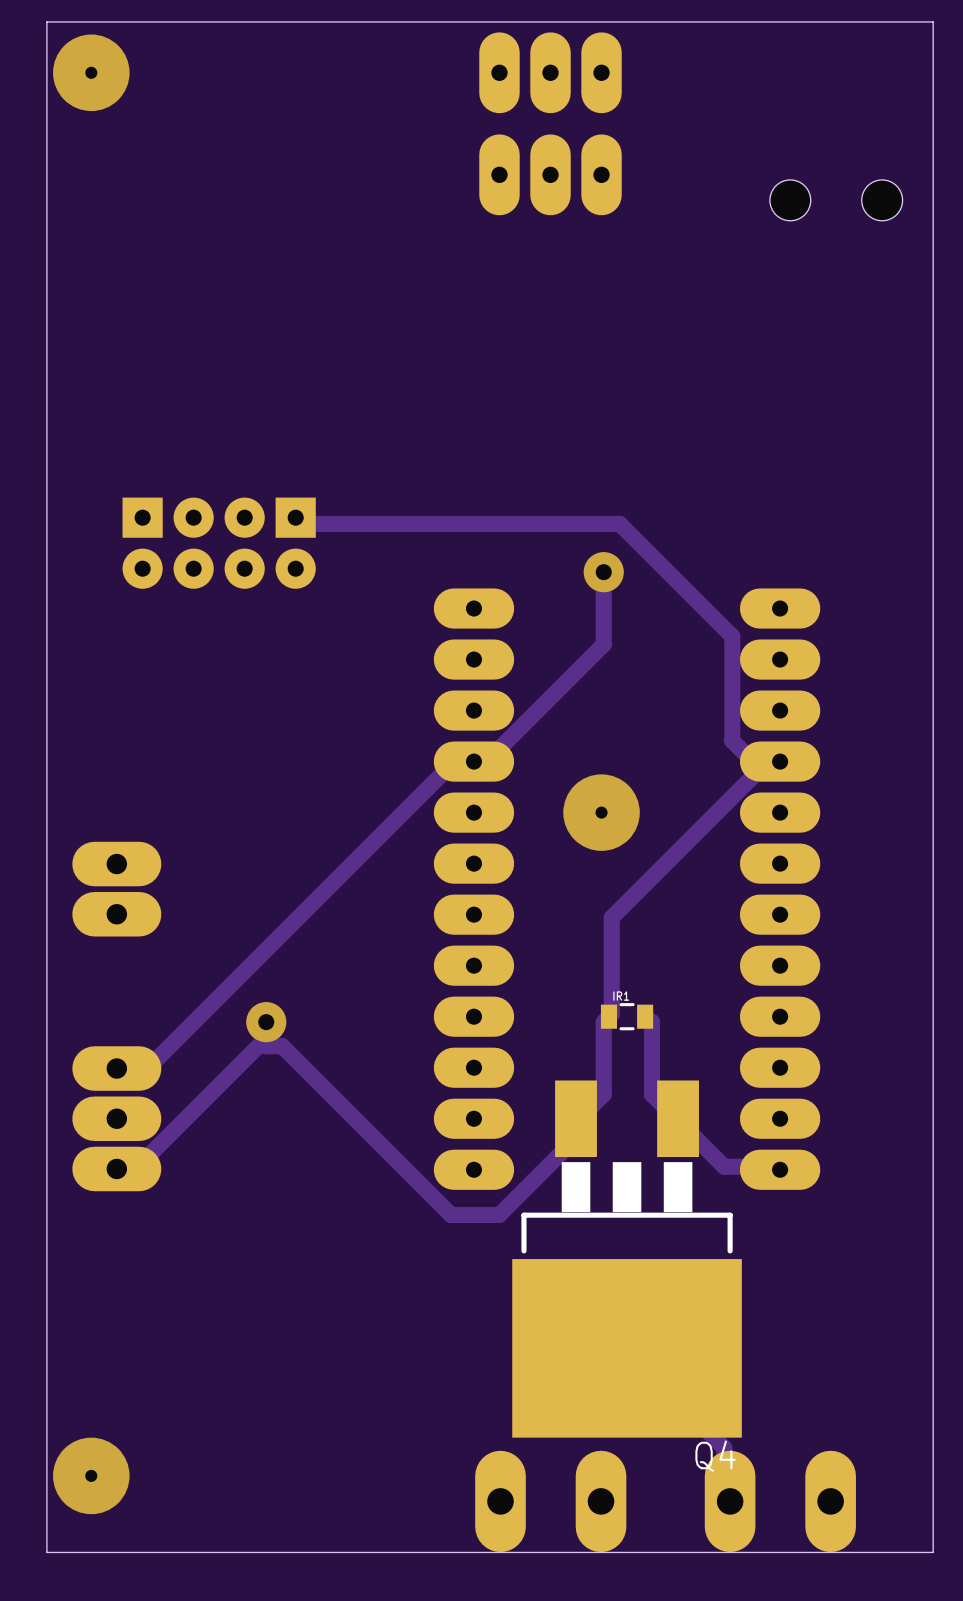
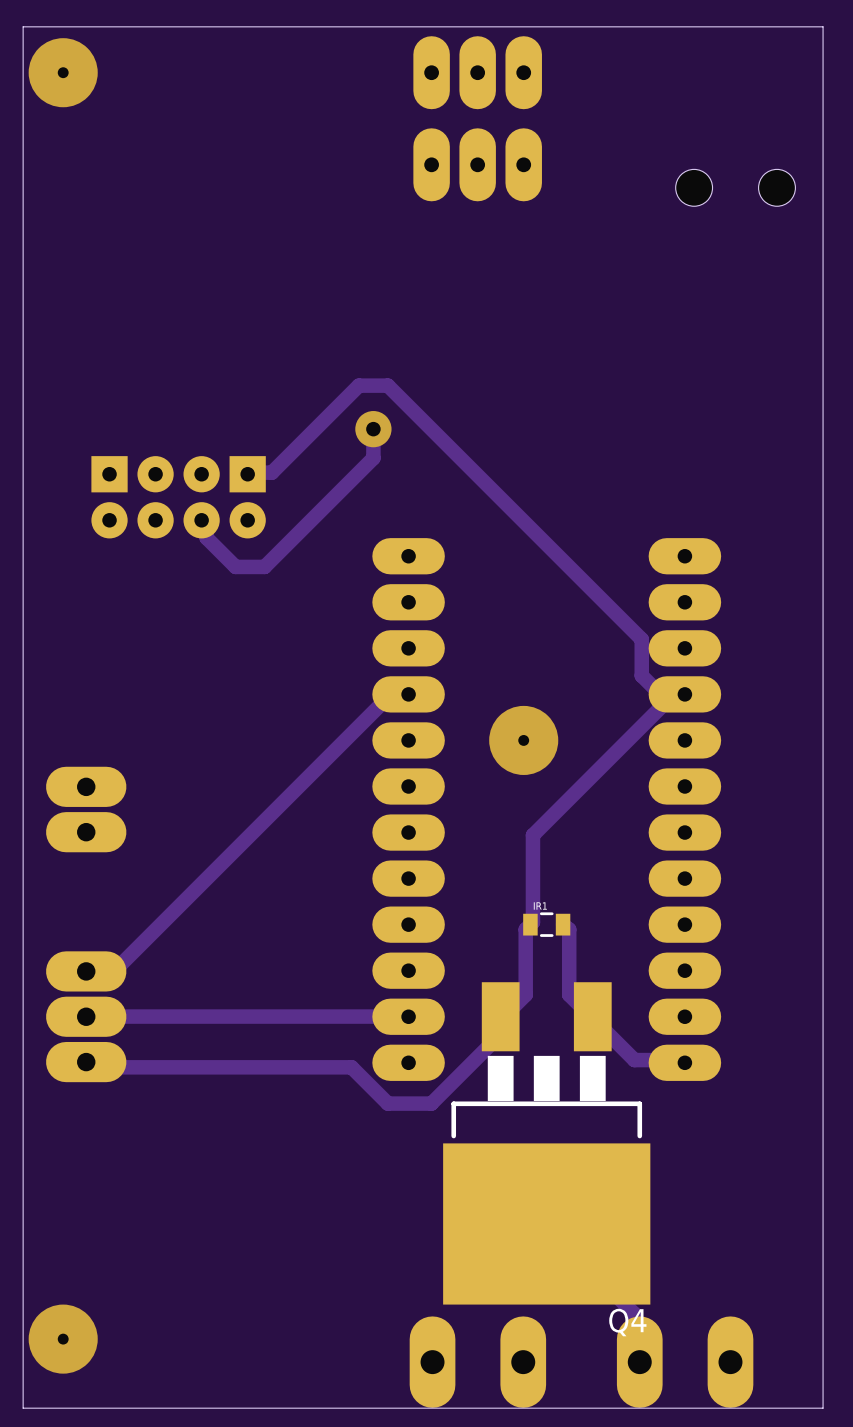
track: none -> (373, 429) (373, 458) (264, 566) (235, 566) (206, 537) (206, 523) (201, 520)
via: none -> (373, 429)
track: (295, 517) (298, 523) (619, 523) (732, 636) (732, 700) -> (247, 474) (271, 472) (358, 385) (387, 385) (641, 639)
track: (603, 572) (603, 644) (491, 756) (475, 756) (473, 761) -> none
via: (603, 572) -> none
track: (266, 1022) (266, 1038) (137, 1166) (121, 1166) (116, 1168) -> none
via: (266, 1022) -> none
track: (262, 1042) (266, 1046) (282, 1046) (410, 1174) -> (86, 1062) (90, 1067) (351, 1067)
track: none -> (408, 1016) (86, 1016)

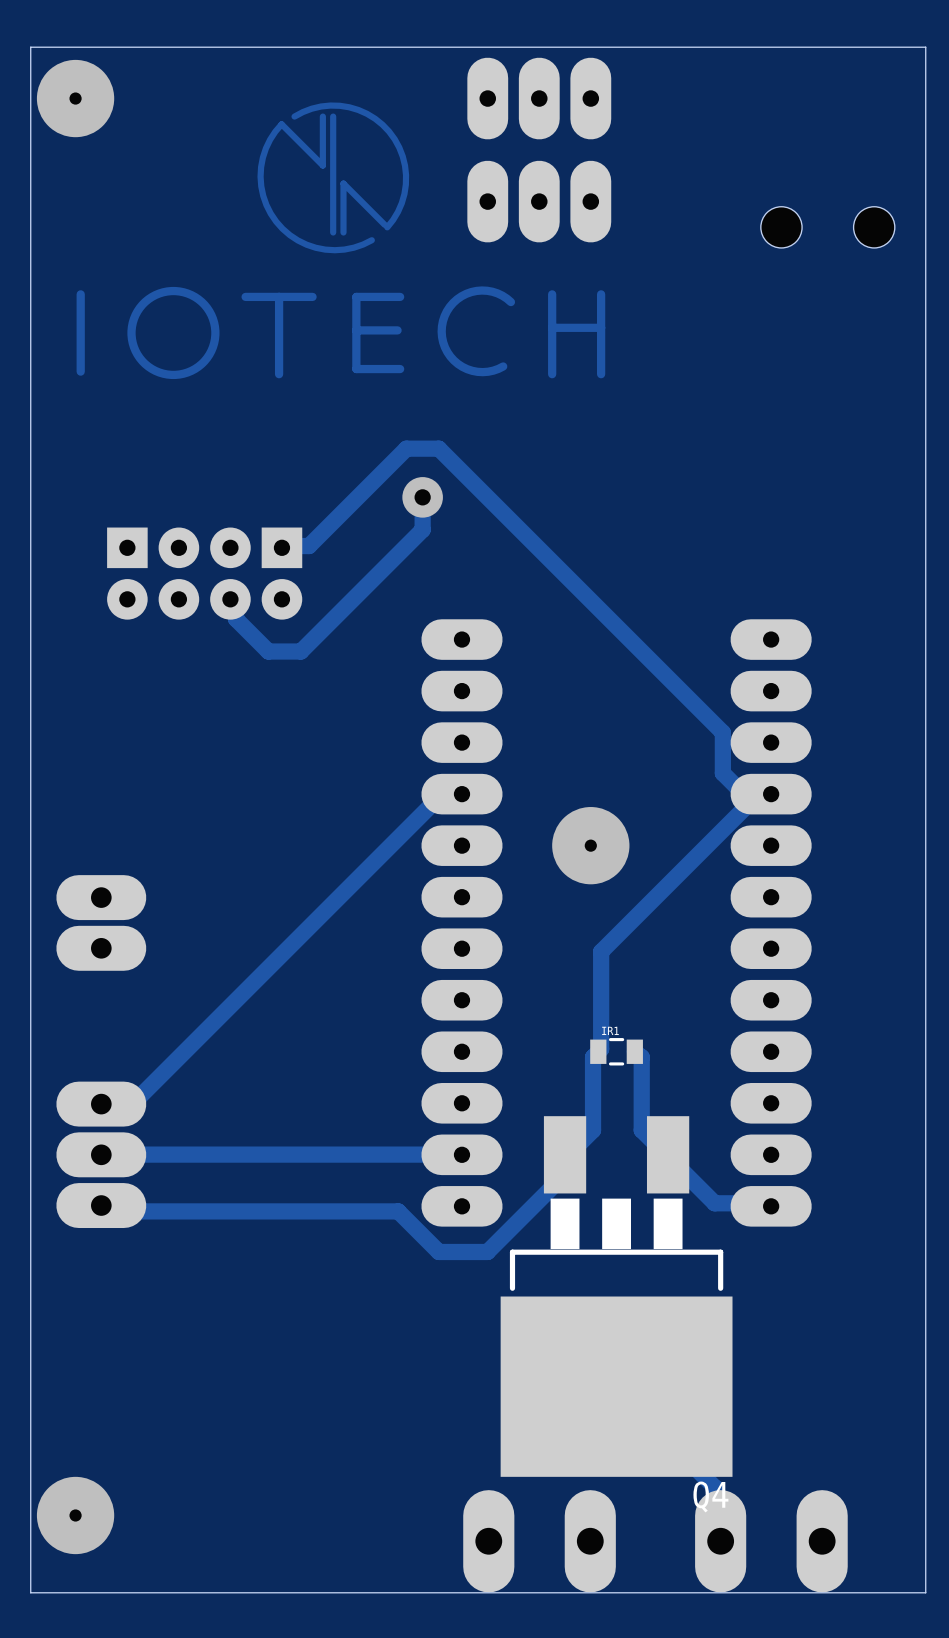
drawing: none -> [76, 102, 606, 380]

